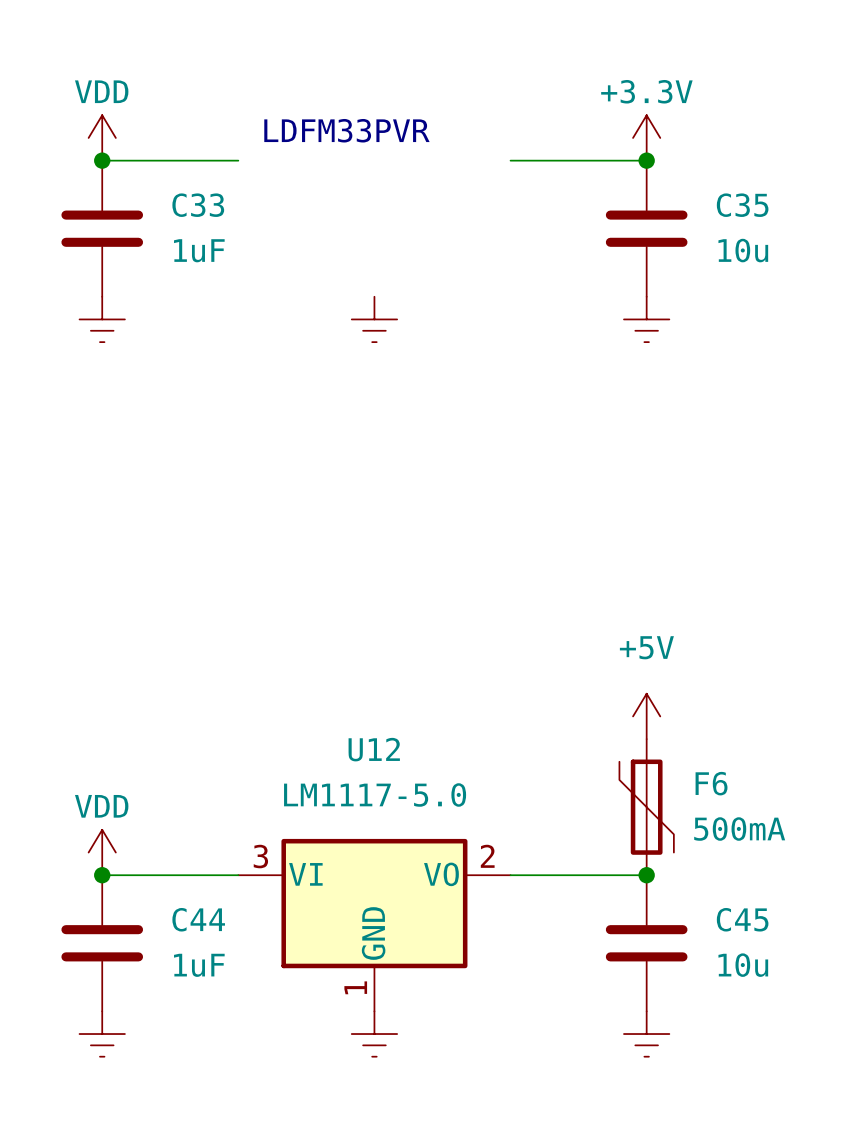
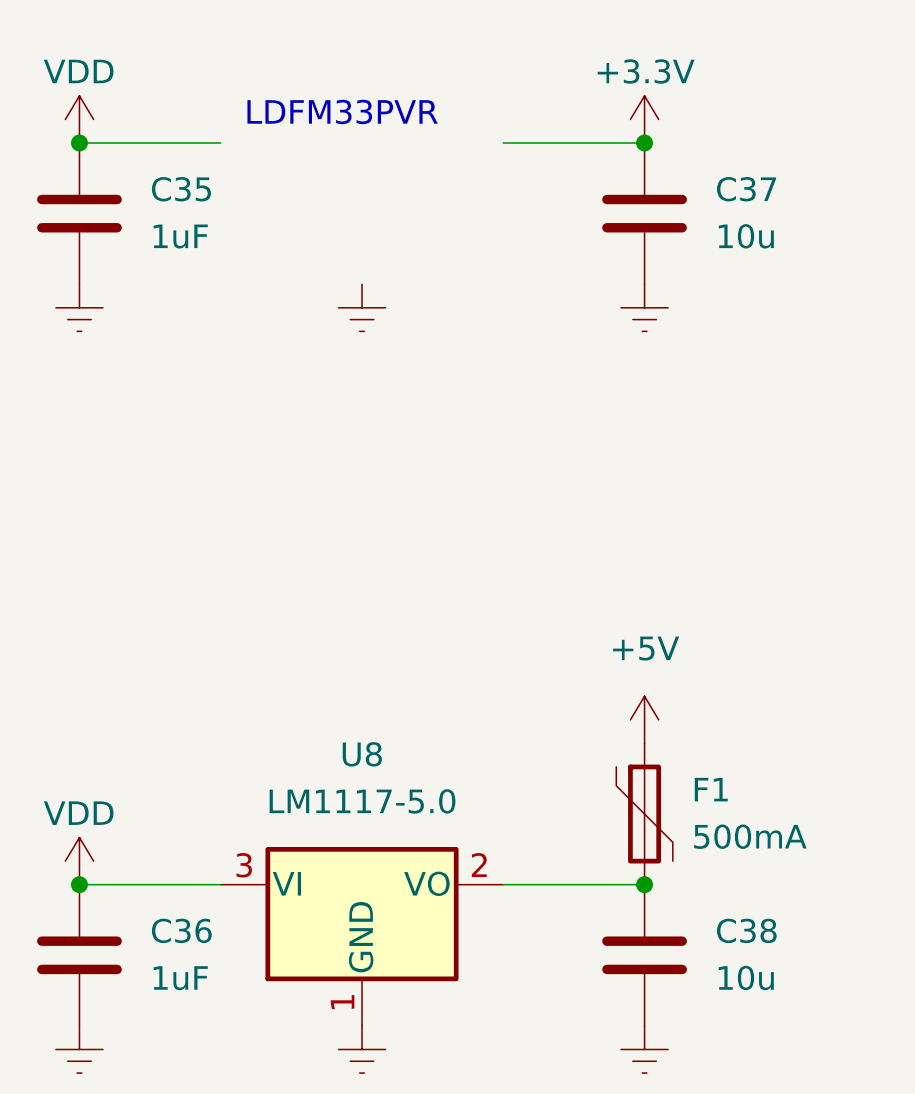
C33 name: C33 (198, 205) -> C35 (181, 189)
C35 name: C35 (742, 205) -> C37 (746, 189)
U12 name: U12 (374, 749) -> U8 (362, 754)
F6 name: F6 (711, 783) -> F1 (711, 789)
C44 name: C44 (198, 919) -> C36 (181, 930)
C45 name: C45 (742, 919) -> C38 (746, 930)

